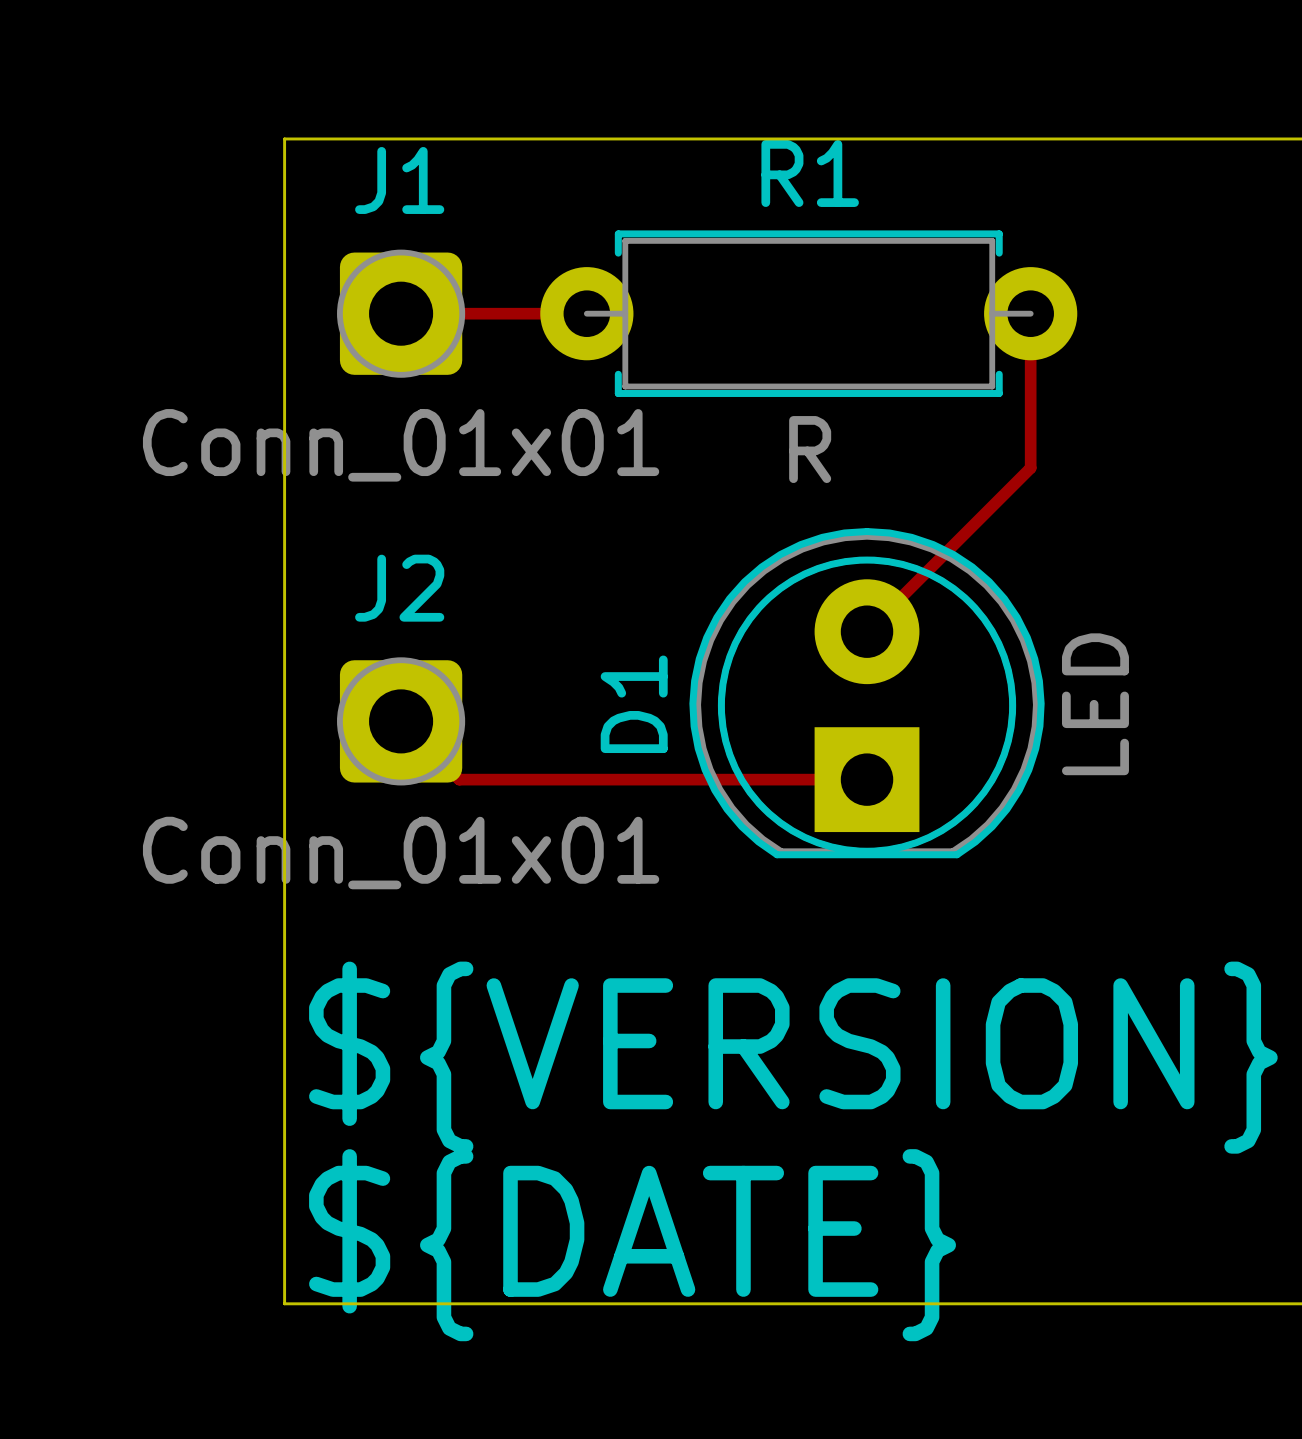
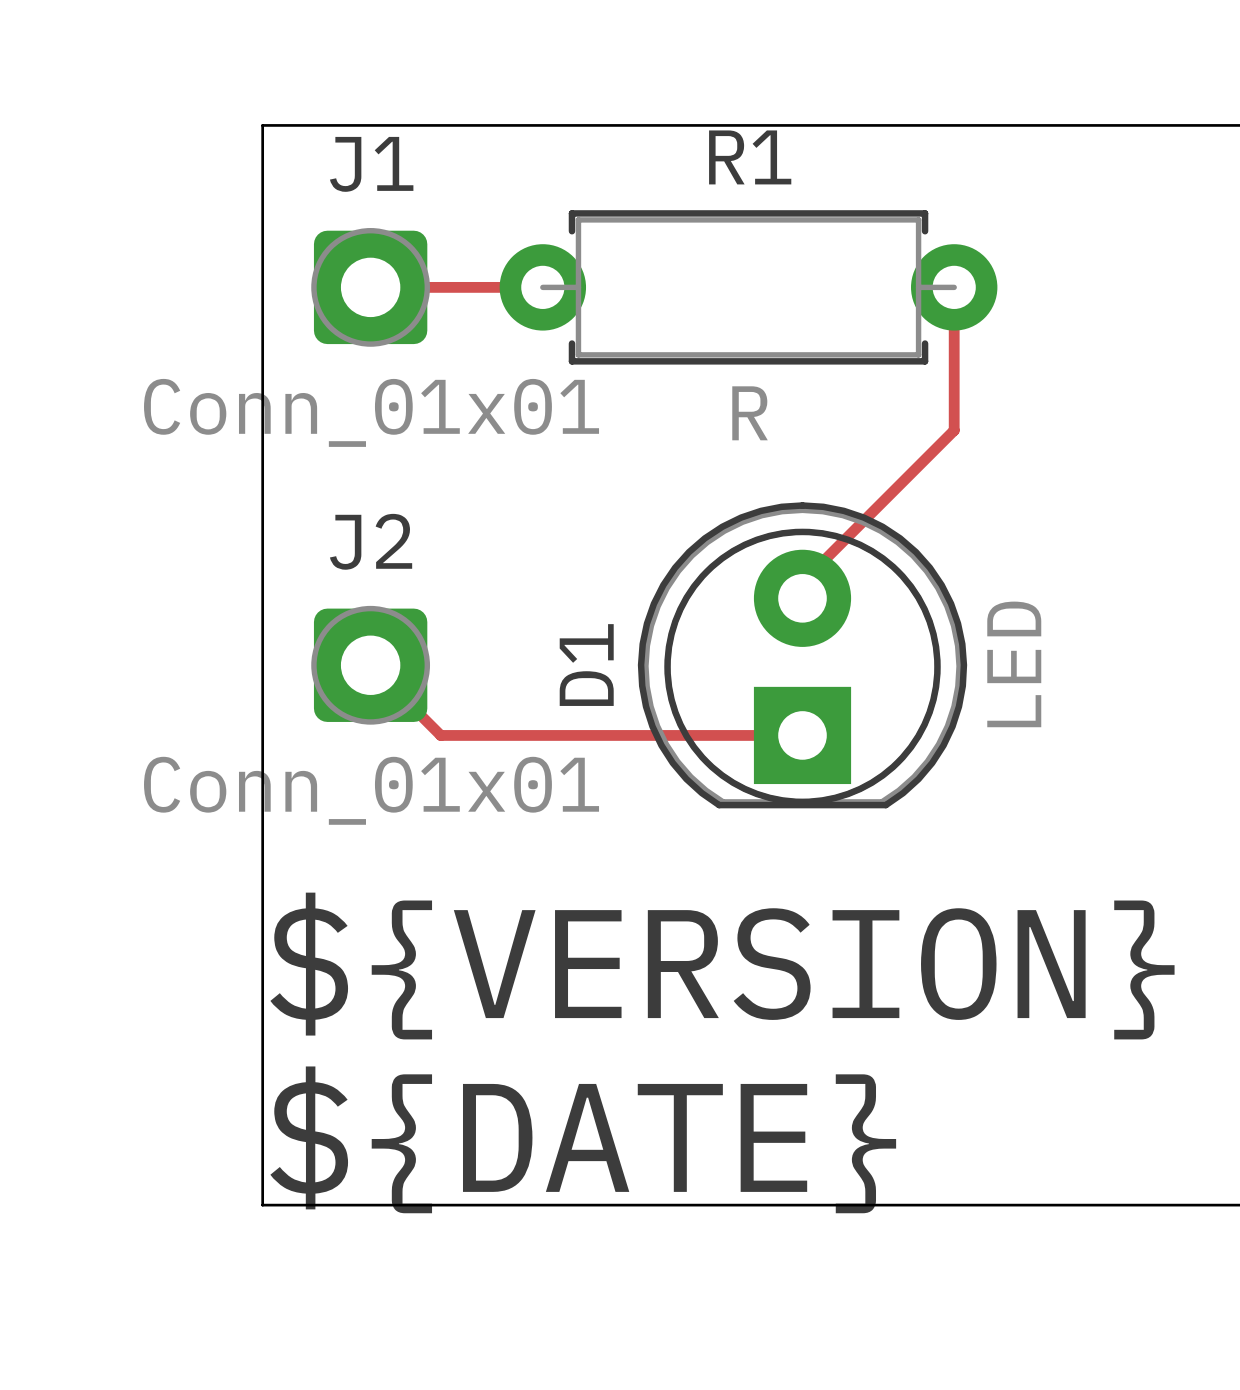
D1 position: (867, 693) -> (802, 655)
track: (459, 779) (867, 779) -> (424, 719) (440, 735) (802, 735)

